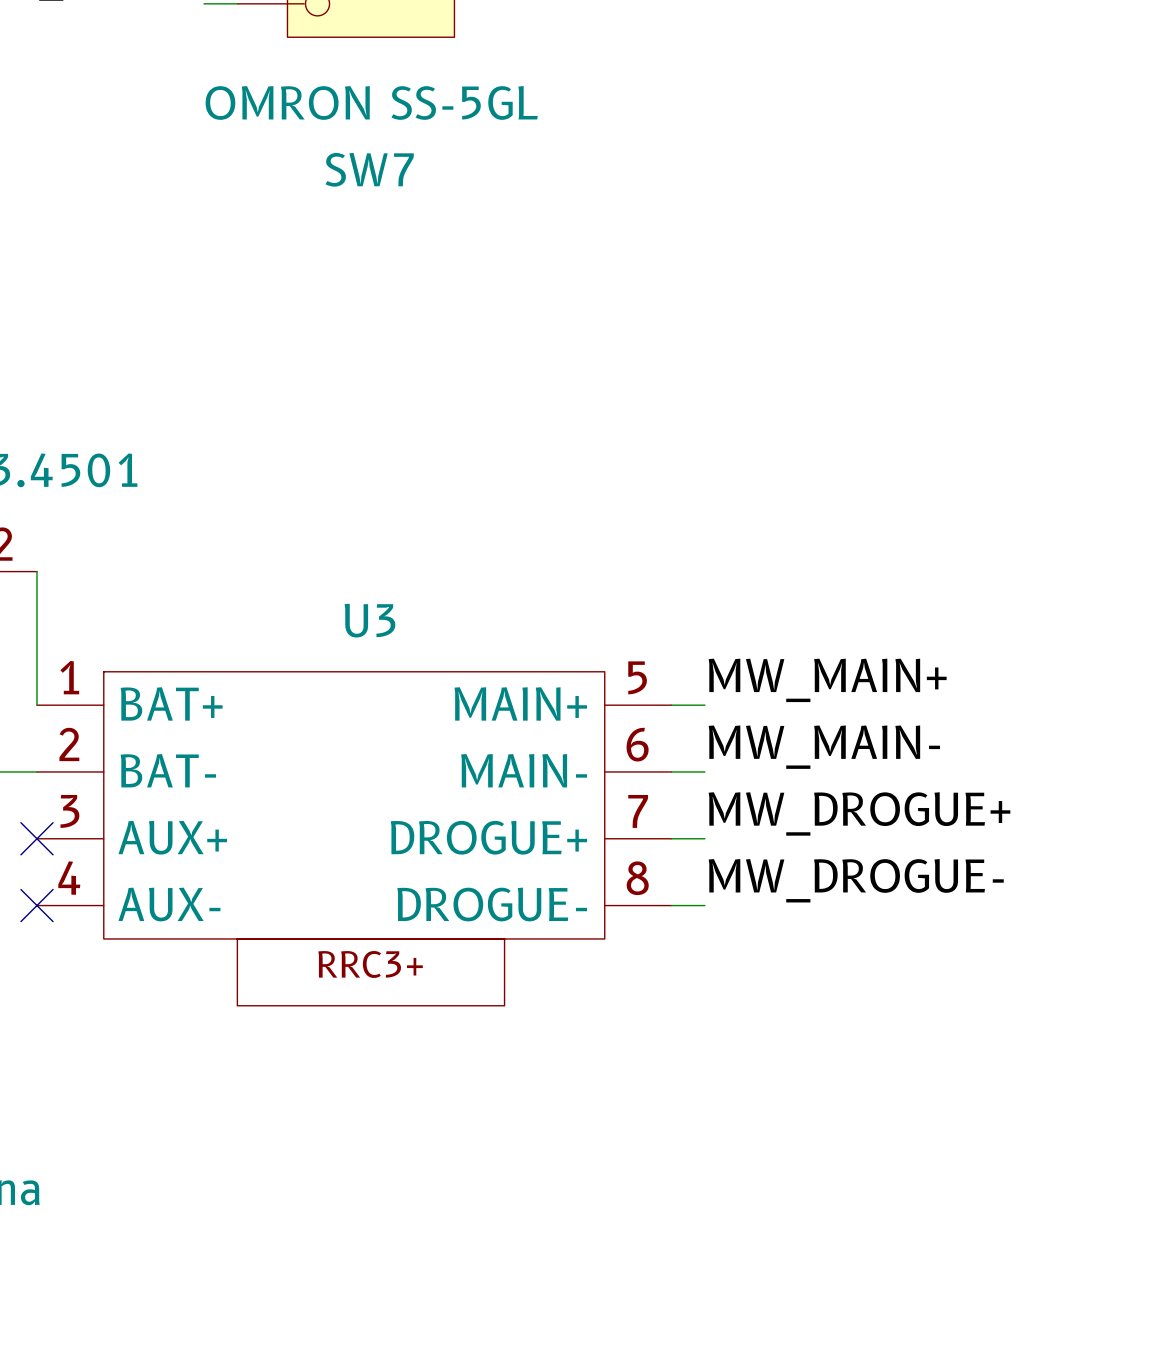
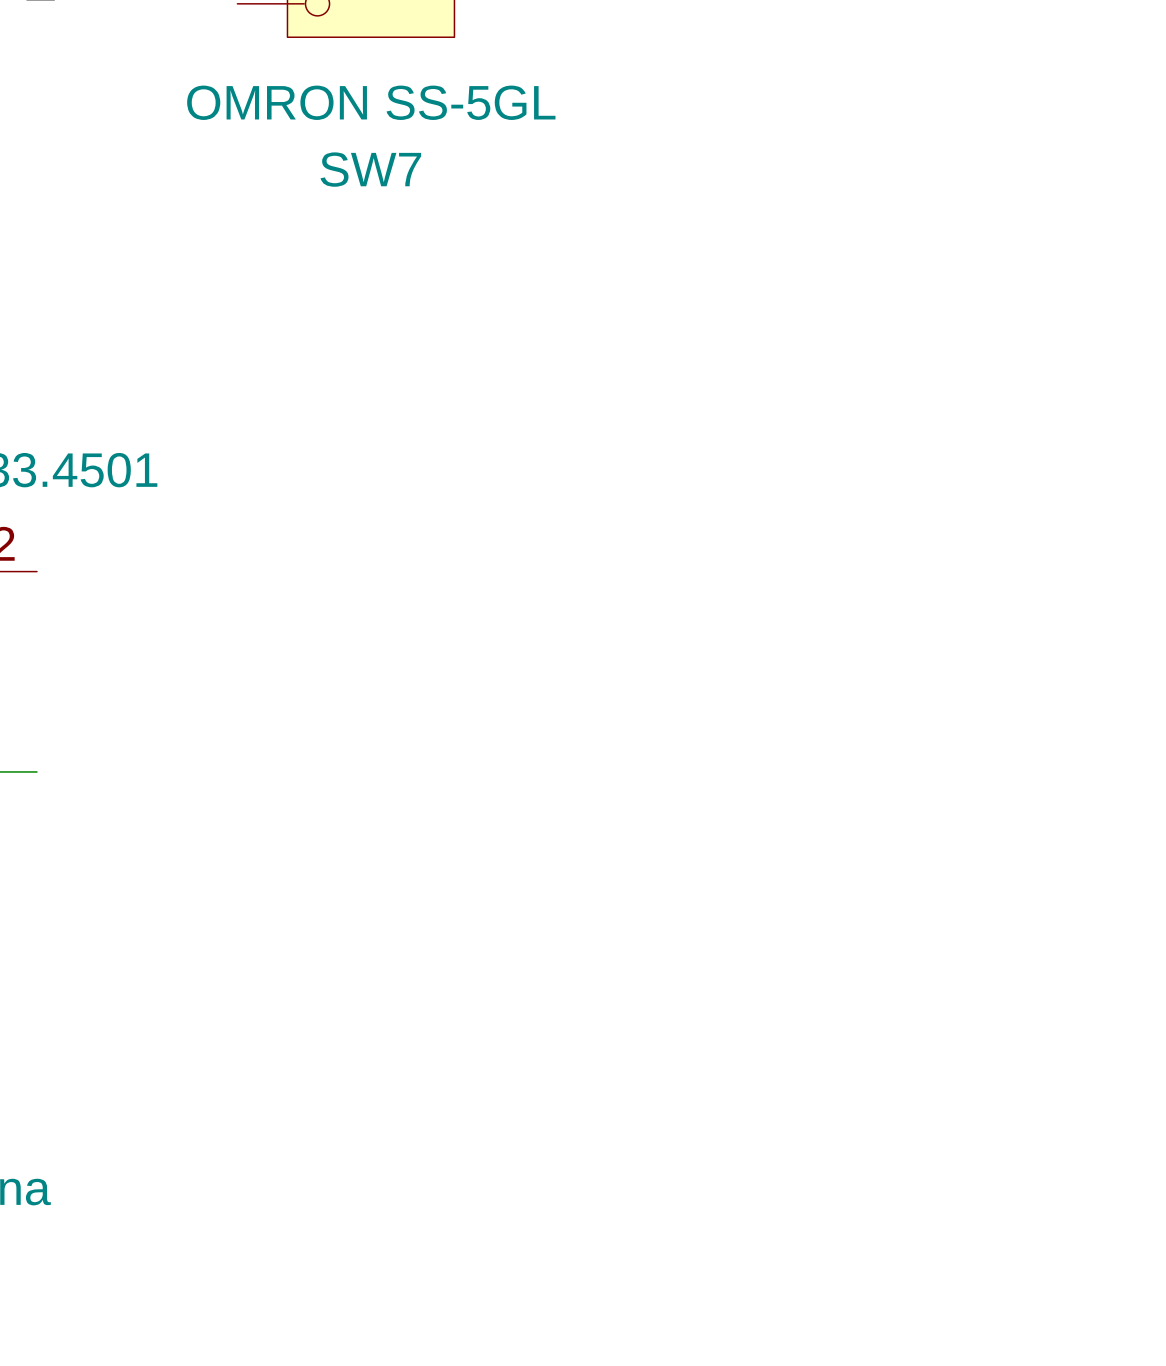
wire: (203, 3) (237, 3) -> none
wire: (36, 571) (36, 705) -> none
label: MW_MAIN+ (827, 680) -> none
wire: (671, 705) (704, 705) -> none
label: MW_MAIN- (824, 747) -> none
wire: (671, 771) (704, 771) -> none
label: MW_DROGUE+ (859, 813) -> none
no-connect mark: (36, 838) -> none
U3: (354, 838) -> none
wire: (671, 838) (704, 838) -> none
label: MW_DROGUE- (856, 880) -> none
no-connect mark: (36, 905) -> none
wire: (671, 905) (704, 905) -> none

